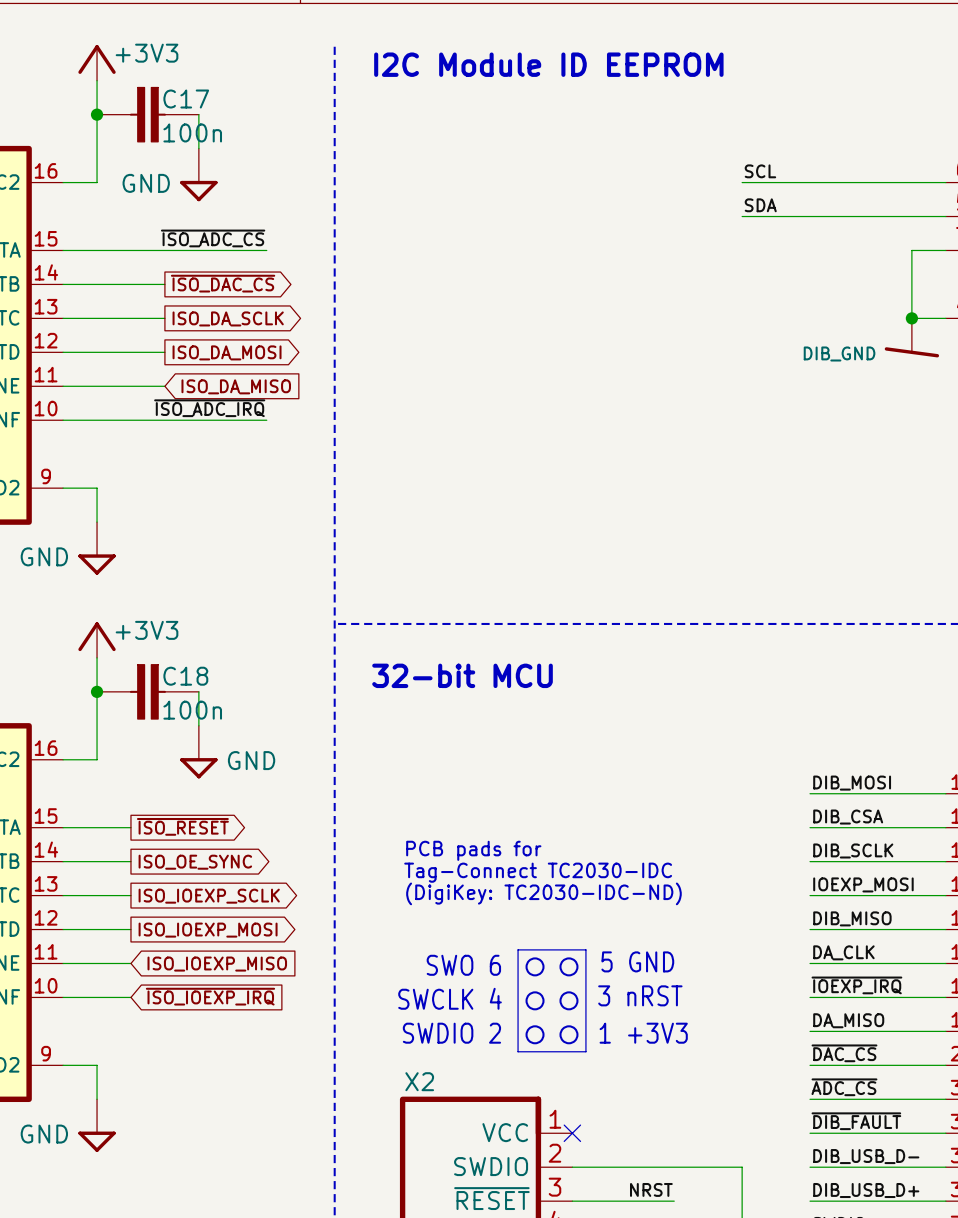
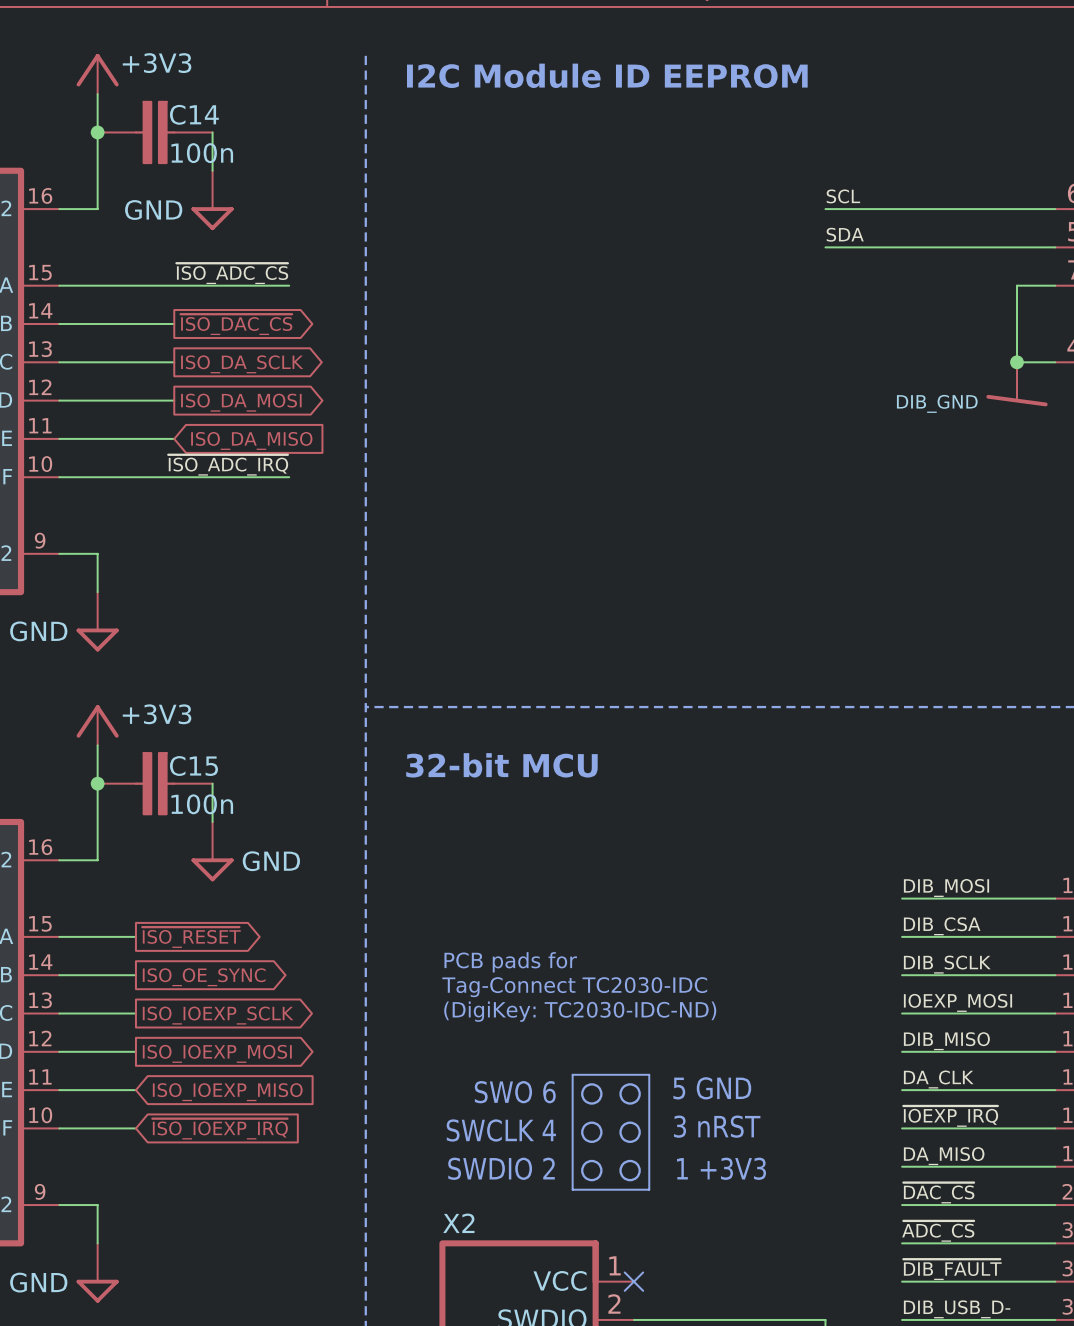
C17 name: C17 (186, 99) -> C14 (194, 114)
C18 name: C18 (185, 676) -> C15 (193, 766)

